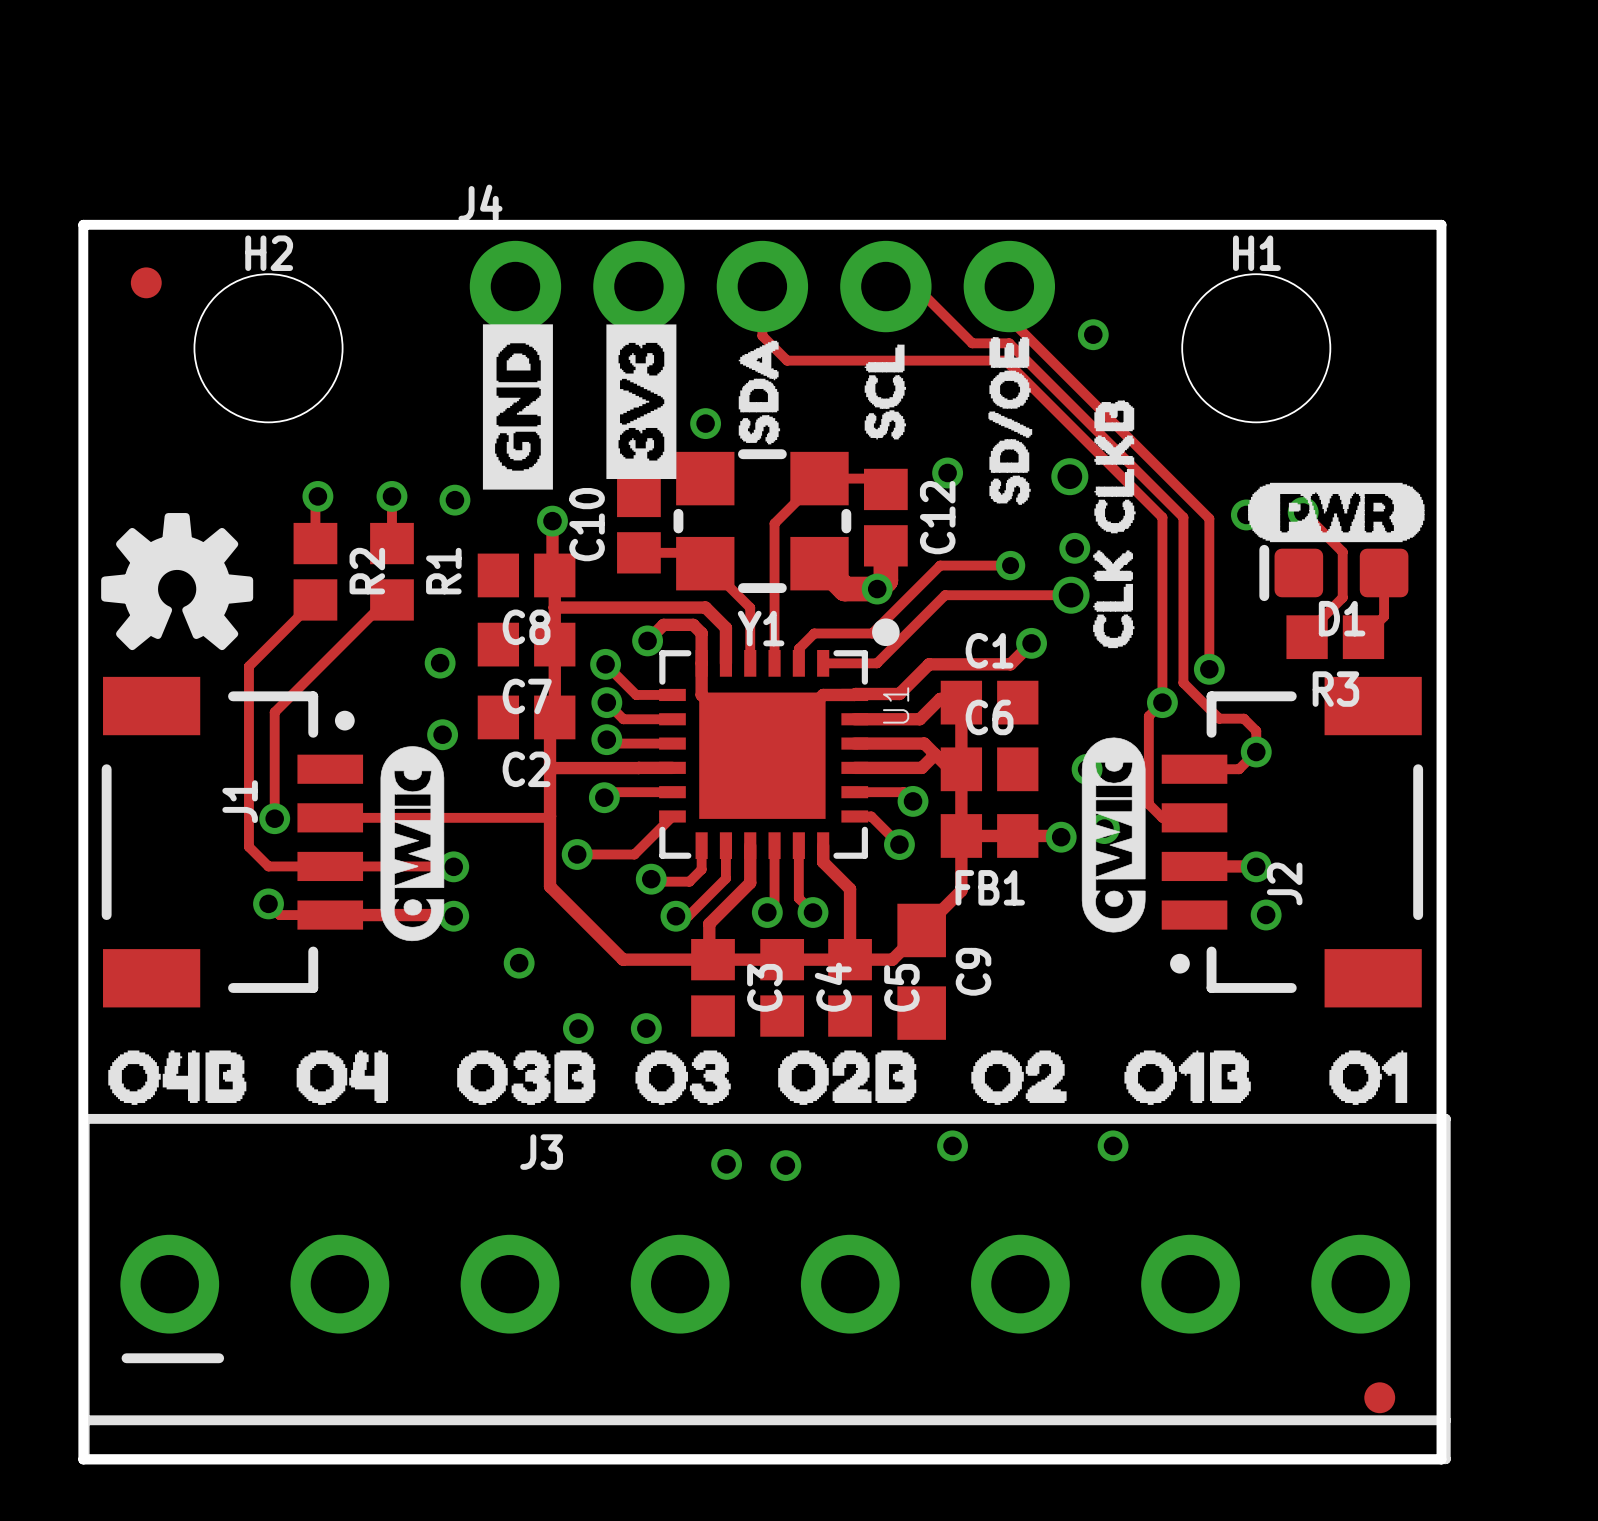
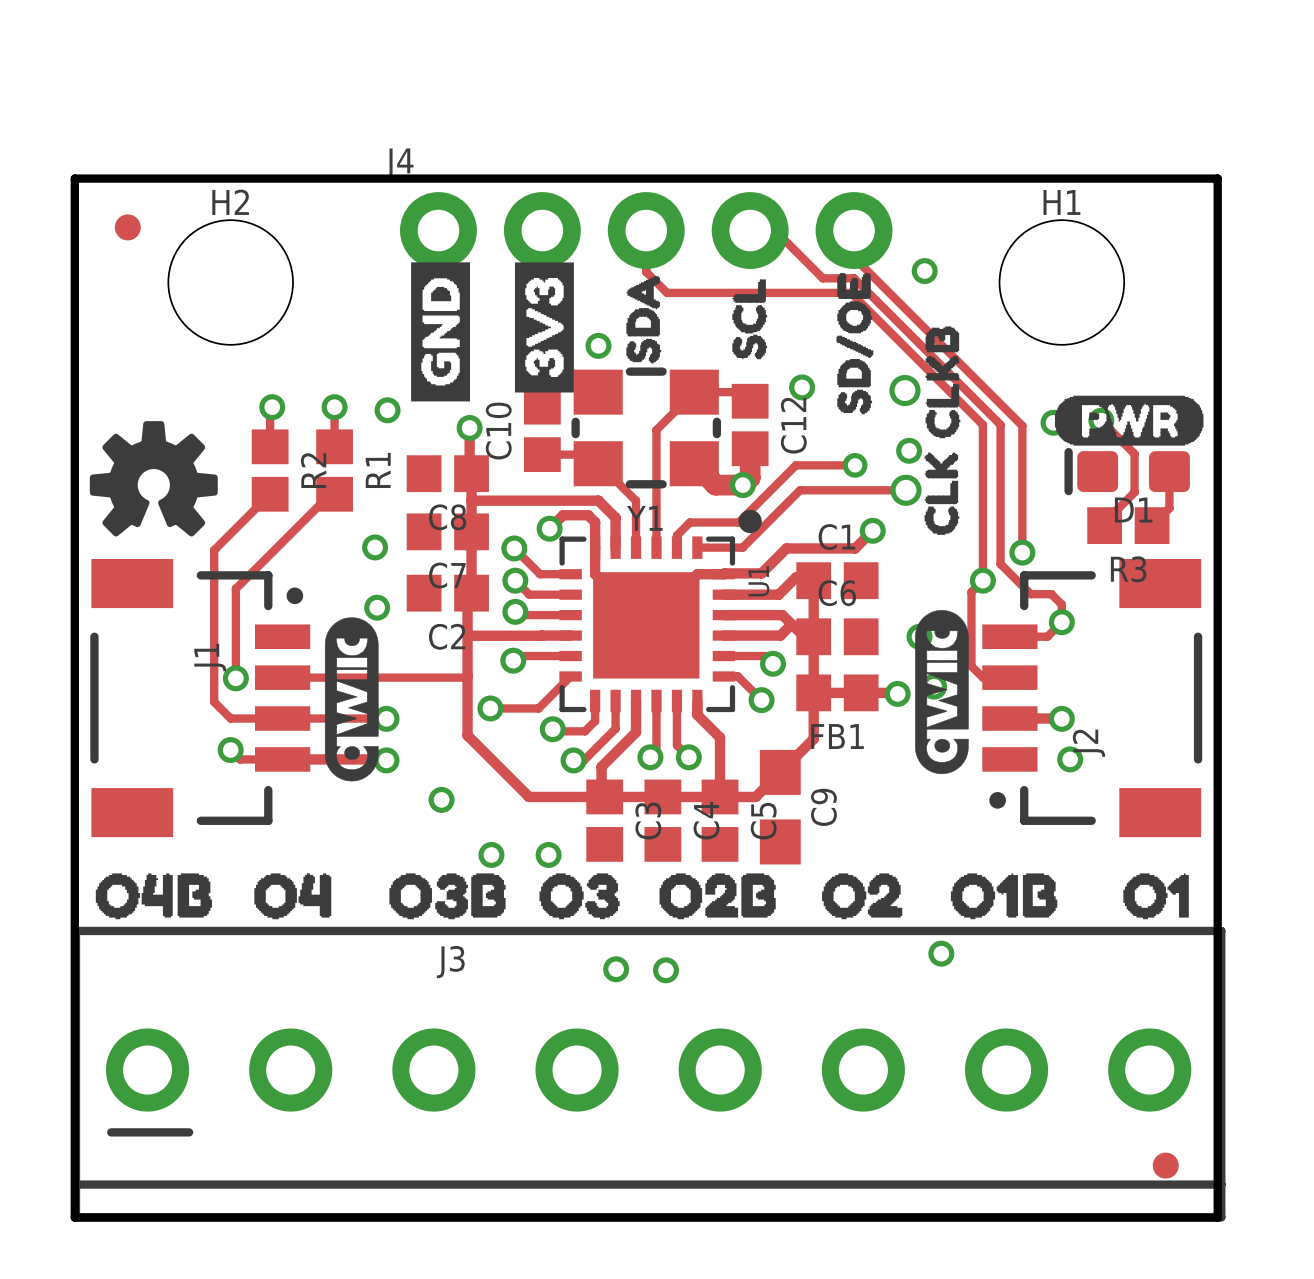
via: (952, 1145) -> none

